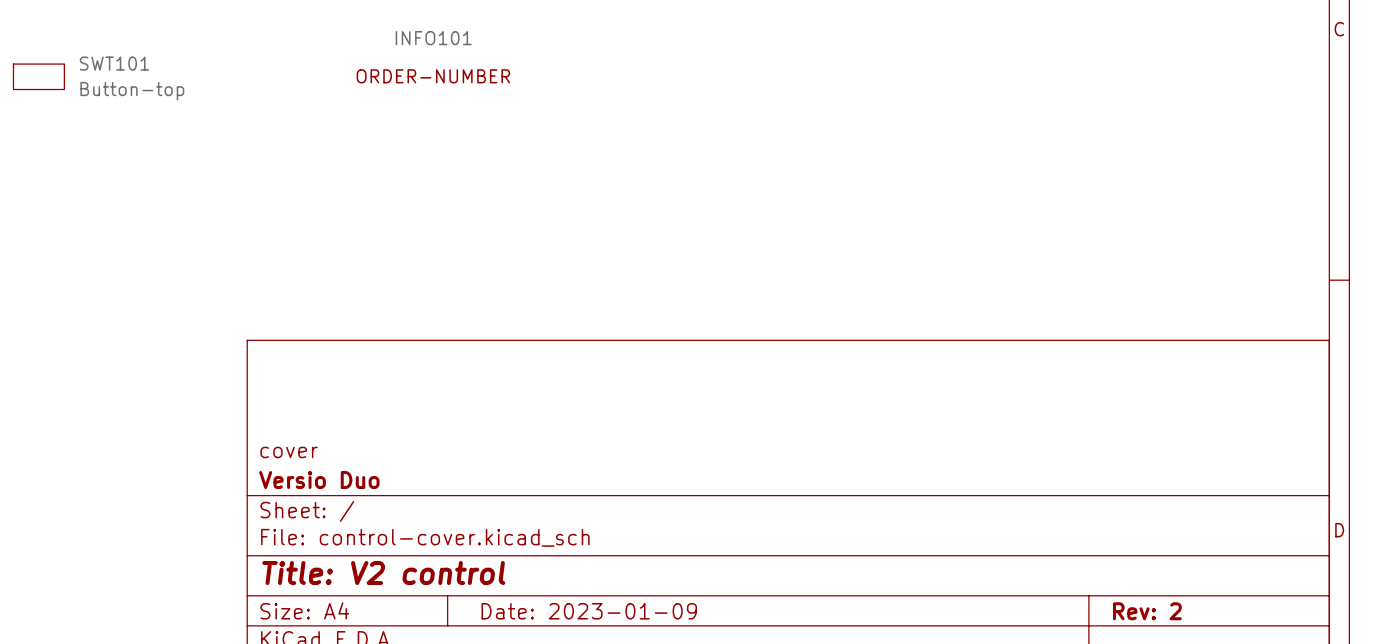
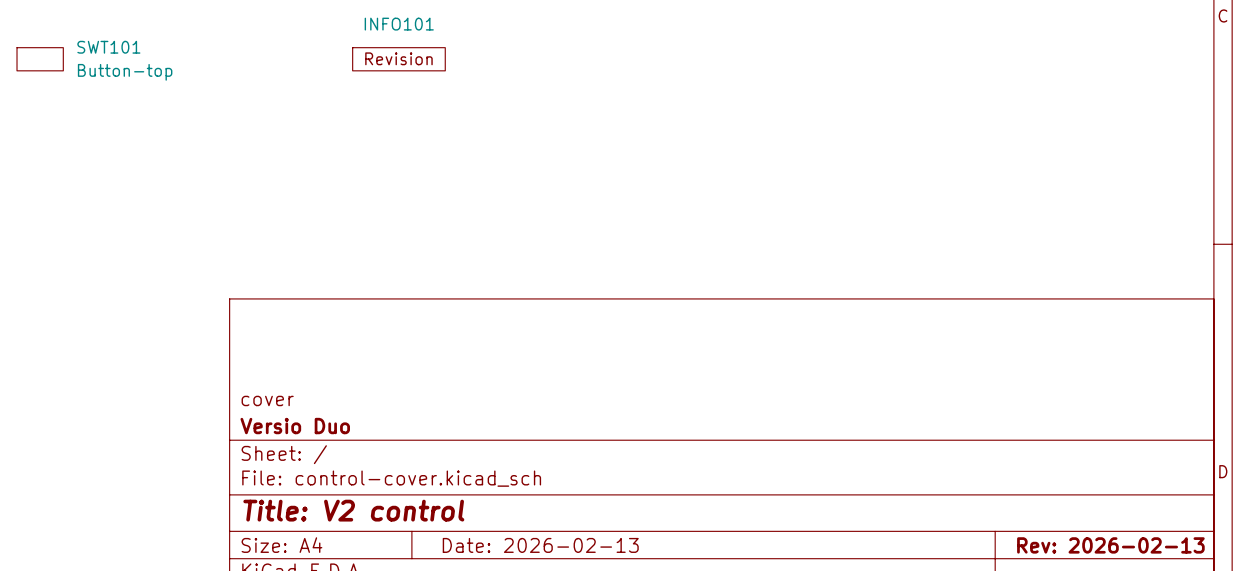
INFO101 symbol: [356, 31, 511, 84] -> [352, 47, 446, 71]
title block: Date: 2023-01-09 (589, 611) -> Date: 2026-02-13 (540, 545)
title block: Rev: 2 (1147, 611) -> Rev: 2026-02-13 (1110, 545)

